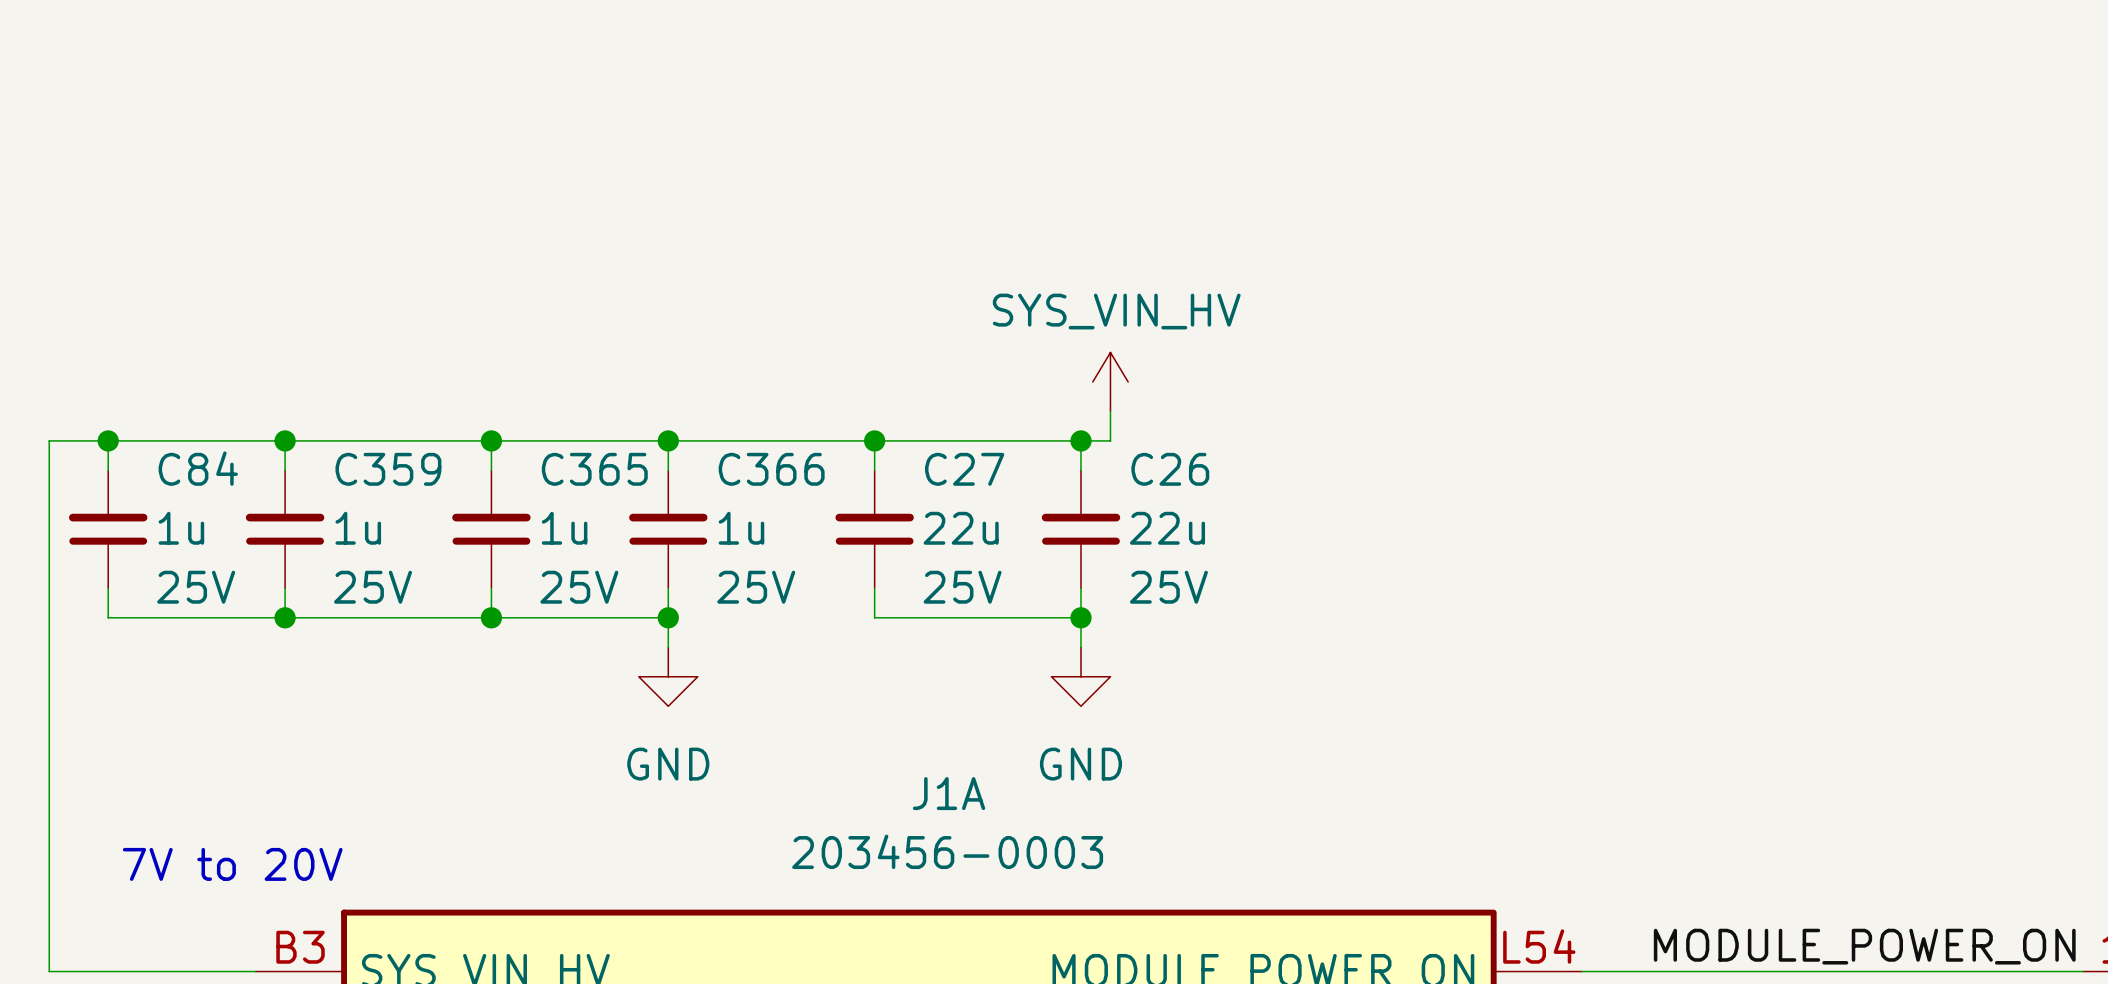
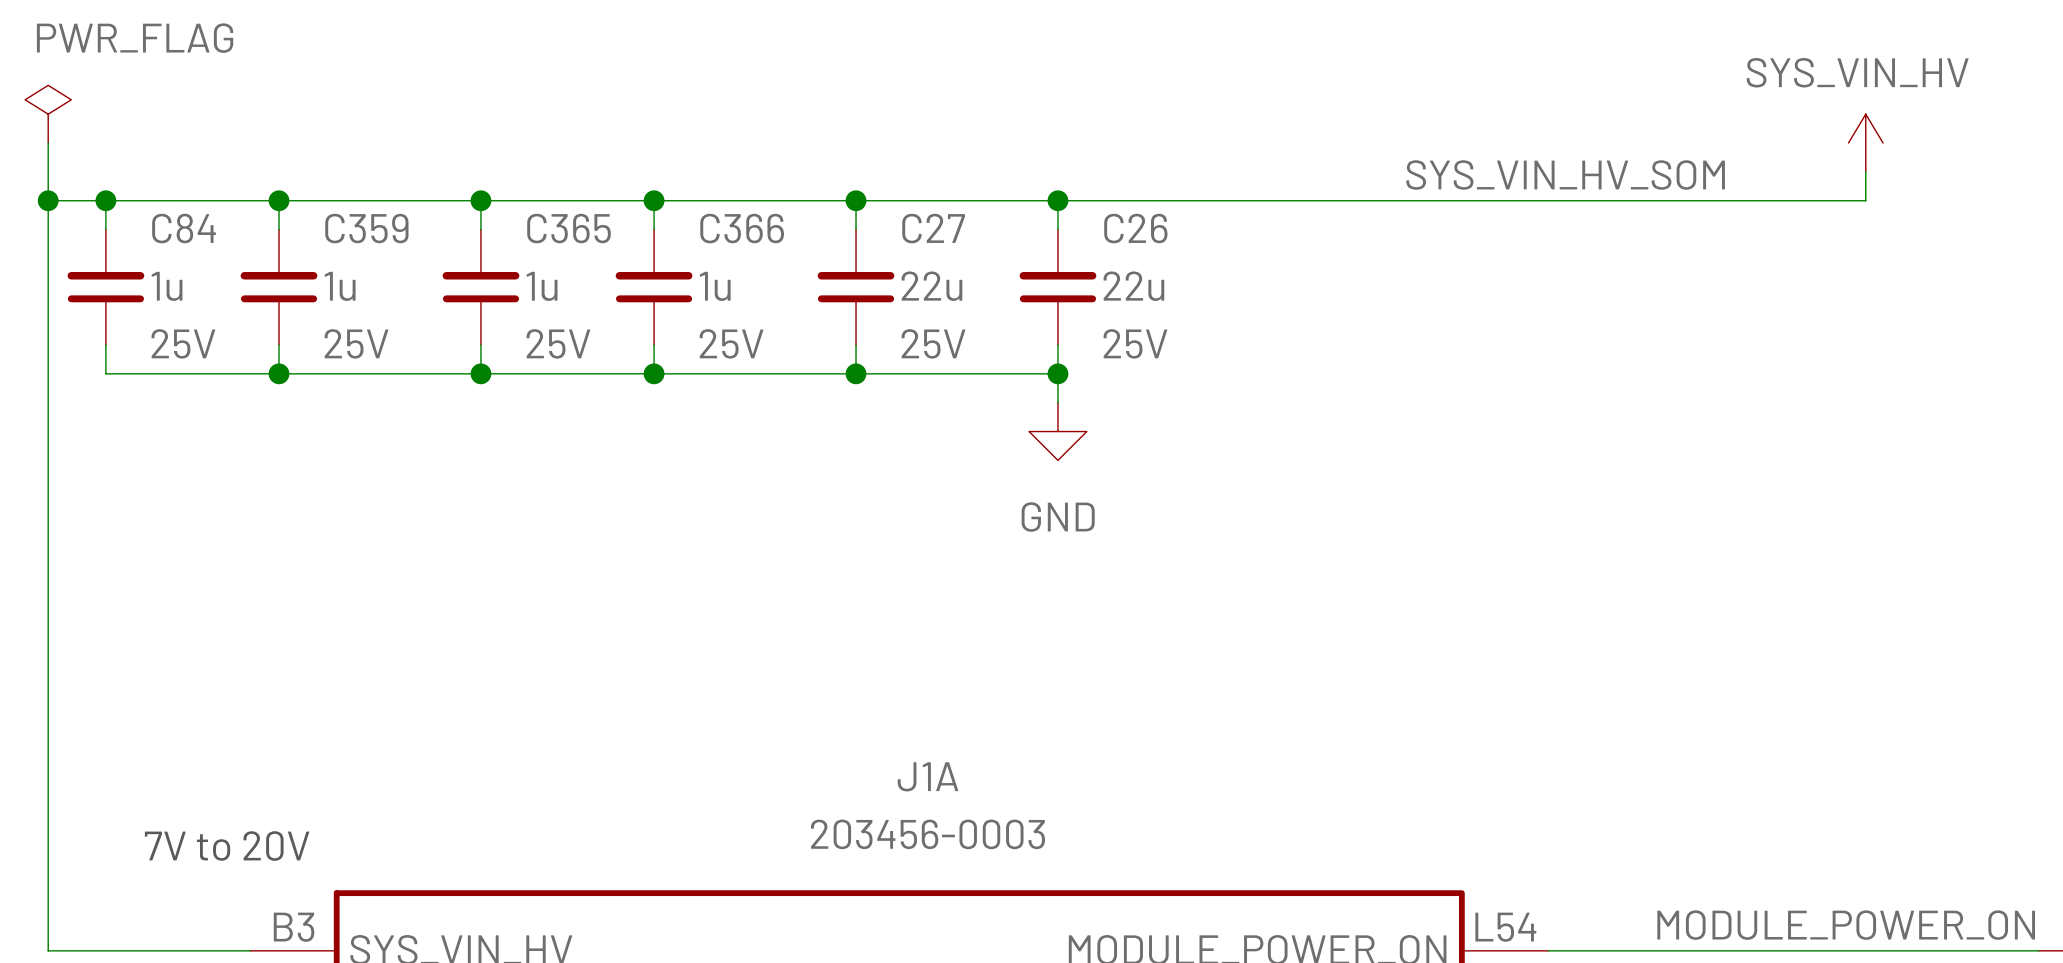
power symbol: none -> PWR_FLAG (48, 114)
power symbol: none -> SYS_VIN_HV (1865, 143)
wire: none -> (1865, 171) (1865, 200) (48, 200)
label: none -> SYS_VIN_HV_SOM (1565, 175)
junction: none -> (48, 200)
junction: none -> (105, 200)
junction: none -> (279, 200)
junction: none -> (480, 200)
junction: none -> (654, 200)
junction: none -> (856, 200)
junction: none -> (1057, 200)
wire: none -> (105, 345) (105, 373) (1057, 373)
wire: none -> (654, 345) (654, 373)
wire: none -> (856, 345) (856, 373)
power symbol: SYS_VIN_HV (1110, 381) -> none
wire: (1110, 411) (1110, 440) (49, 440) -> (48, 143) (48, 431)
wire: (108, 440) (108, 470) -> (105, 200) (105, 229)
junction: (108, 440) -> none
wire: (285, 440) (285, 470) -> (279, 200) (279, 229)
junction position: (285, 440) -> (279, 373)
wire: (491, 440) (491, 470) -> (480, 200) (480, 229)
junction position: (491, 440) -> (480, 373)
wire: (668, 440) (668, 470) -> (654, 200) (654, 229)
junction position: (668, 440) -> (654, 373)
wire: (874, 440) (874, 470) -> (856, 200) (856, 229)
junction position: (874, 440) -> (856, 373)
wire: (1080, 440) (1080, 470) -> (1057, 200) (1057, 229)
junction position: (1080, 440) -> (1057, 373)
C84 position: (108, 529) -> (105, 287)
C359 position: (285, 529) -> (279, 287)
C365 position: (491, 529) -> (480, 287)
C366 position: (668, 529) -> (654, 287)
C27 position: (874, 529) -> (856, 287)
C26 position: (1080, 529) -> (1057, 287)
wire: (108, 588) (108, 617) (668, 617) -> none
wire: (285, 588) (285, 617) -> (279, 345) (279, 373)
wire: (491, 588) (491, 617) -> (480, 345) (480, 373)
wire: (668, 588) (668, 647) -> none
wire: (874, 588) (874, 617) (1080, 617) -> none
wire: (1080, 588) (1080, 647) -> (1057, 345) (1057, 402)
junction: (285, 617) -> none
junction: (491, 617) -> none
junction: (668, 617) -> none
junction: (1080, 617) -> none
power symbol: GND (668, 676) -> none
power symbol position: GND (1080, 676) -> GND (1057, 431)

